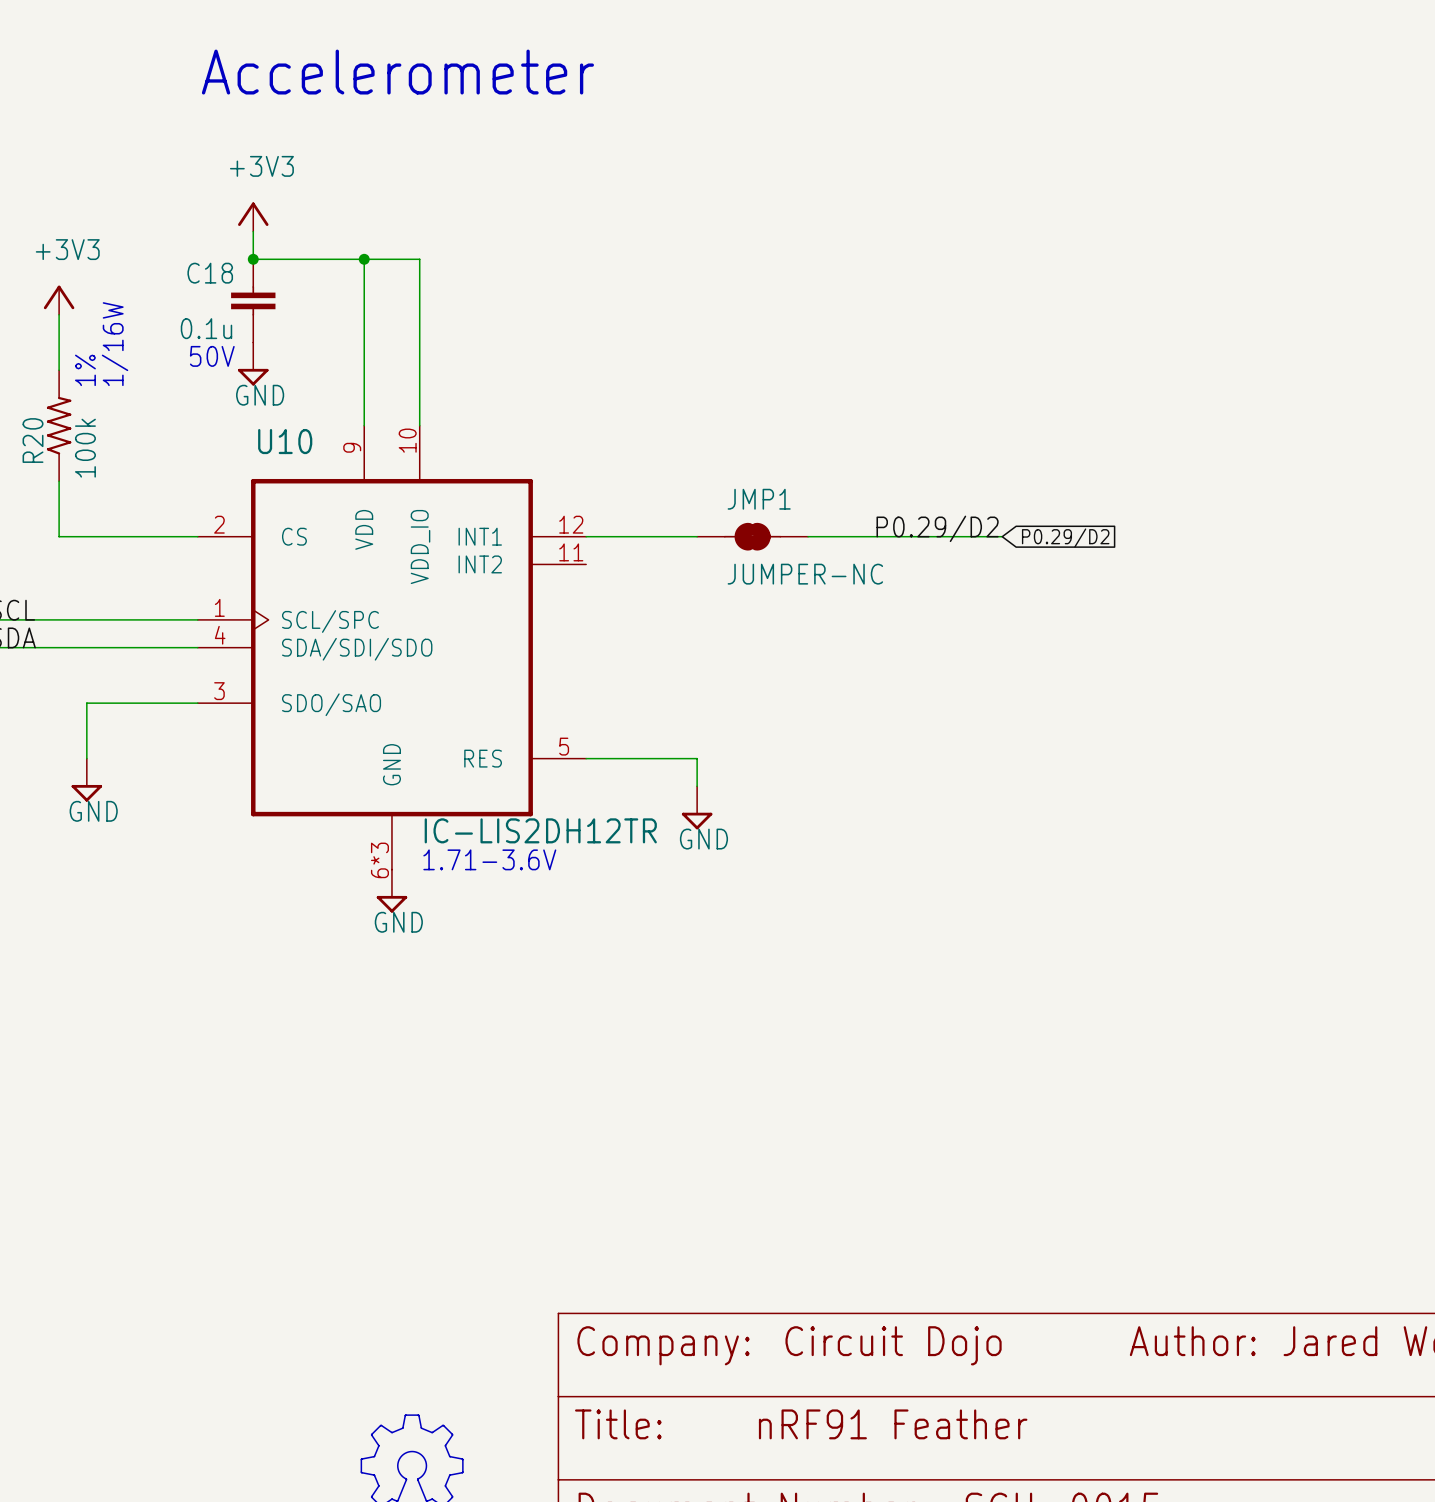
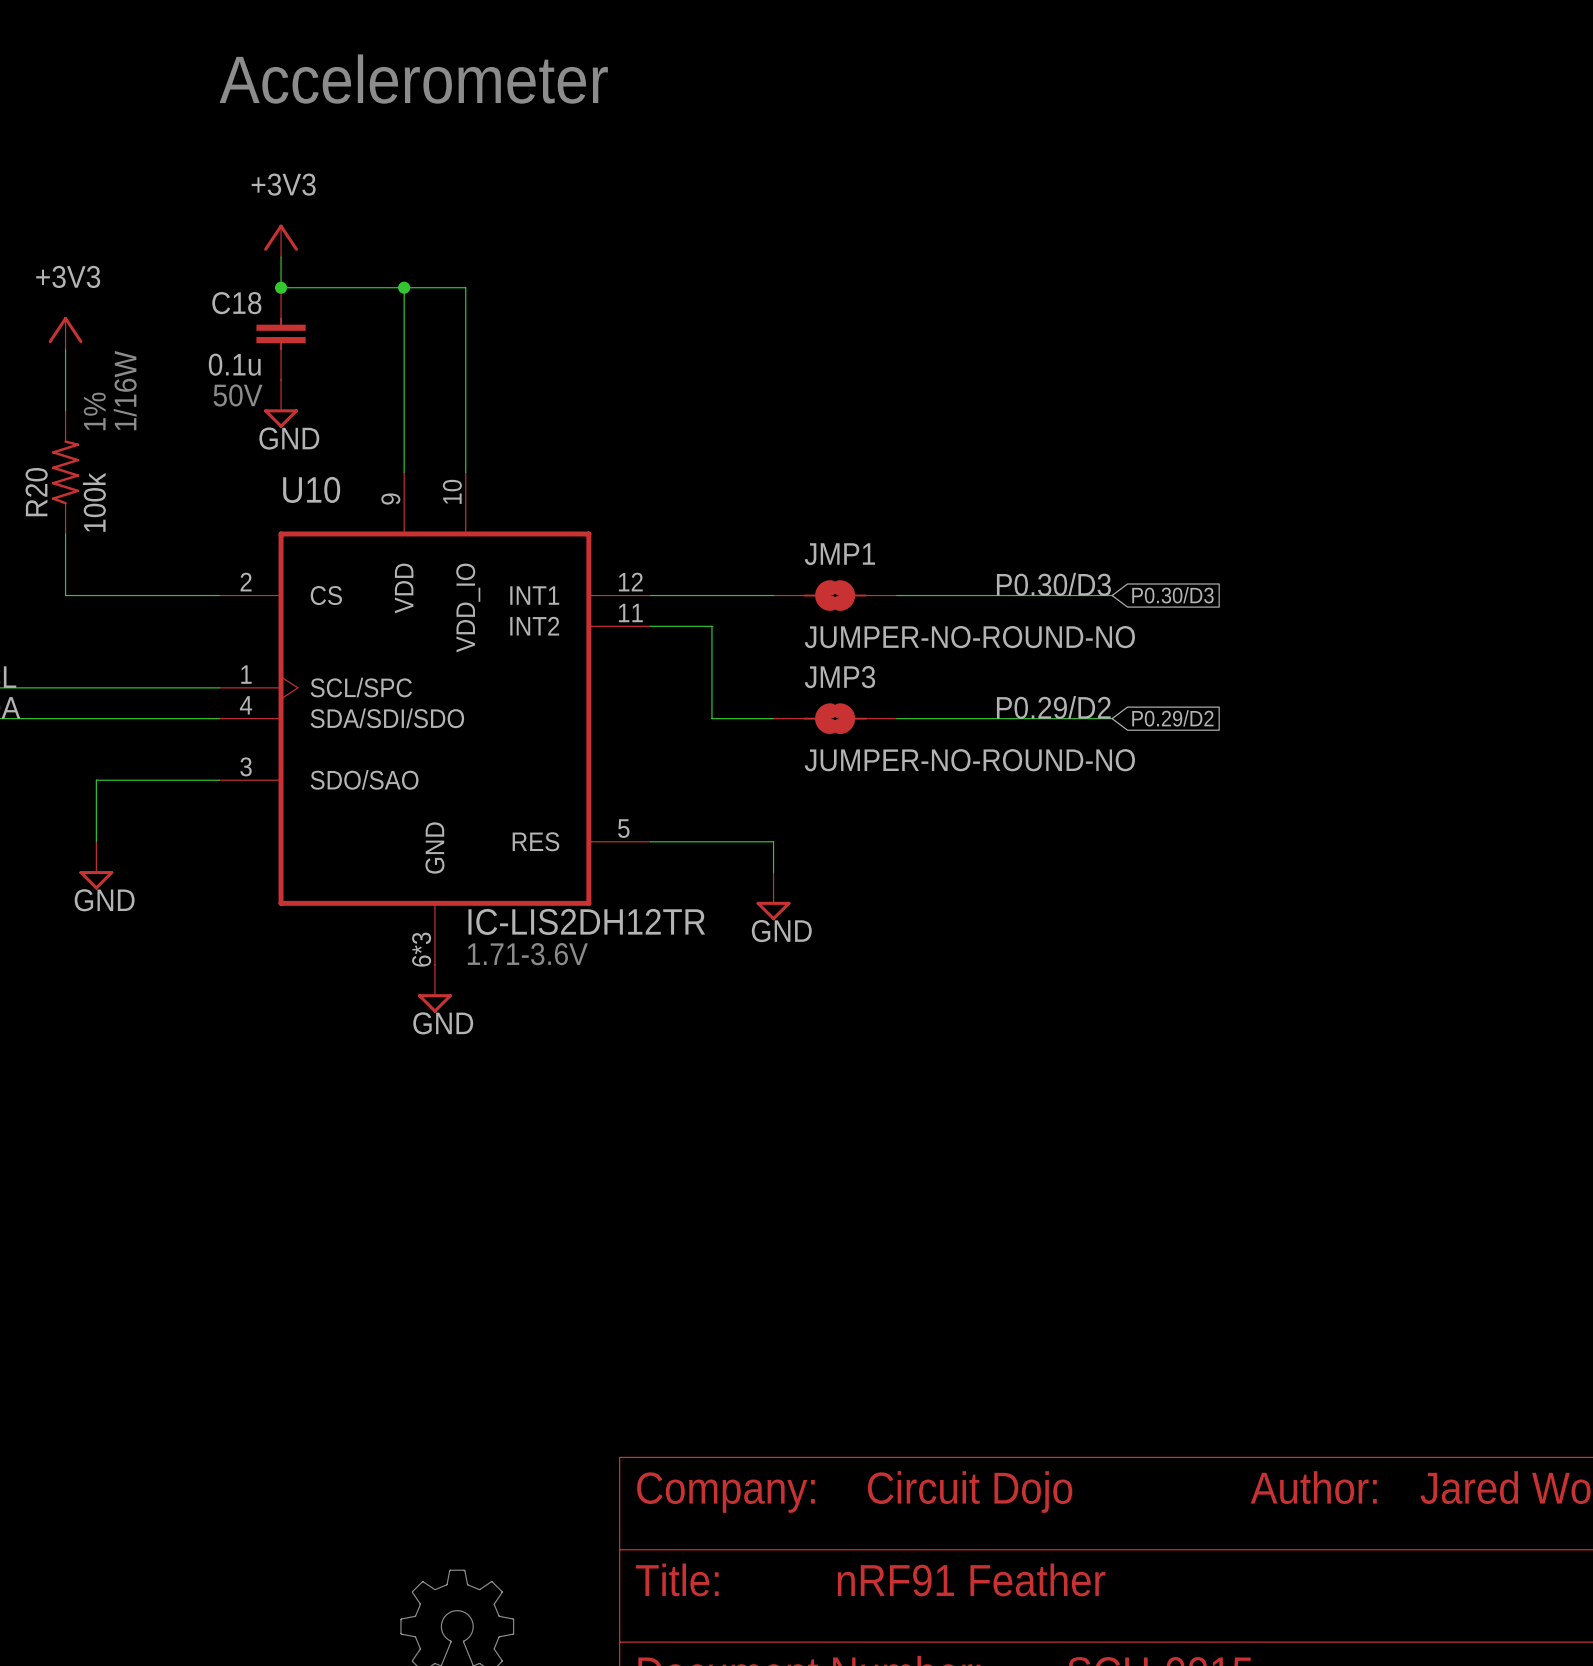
JMP1 symbol: [697, 522, 809, 551] -> [773, 580, 897, 611]
label: P0.29/D2 (937, 528) -> P0.30/D3 (1053, 584)
global label: P0.29/D2 (1065, 538) -> P0.30/D3 (1172, 595)
wire: none -> (650, 626) (711, 626) (711, 718) (773, 718)
JMP1 value: JUMPER-NC (805, 574) -> JUMPER-NO-ROUND-NO (969, 637)
label: none -> P0.29/D2 (1053, 707)
JMP3: none -> JUMPER-NO-ROUND-NO (835, 718)
wire: none -> (896, 718) (1112, 718)
global label: none -> P0.29/D2 (1172, 718)

